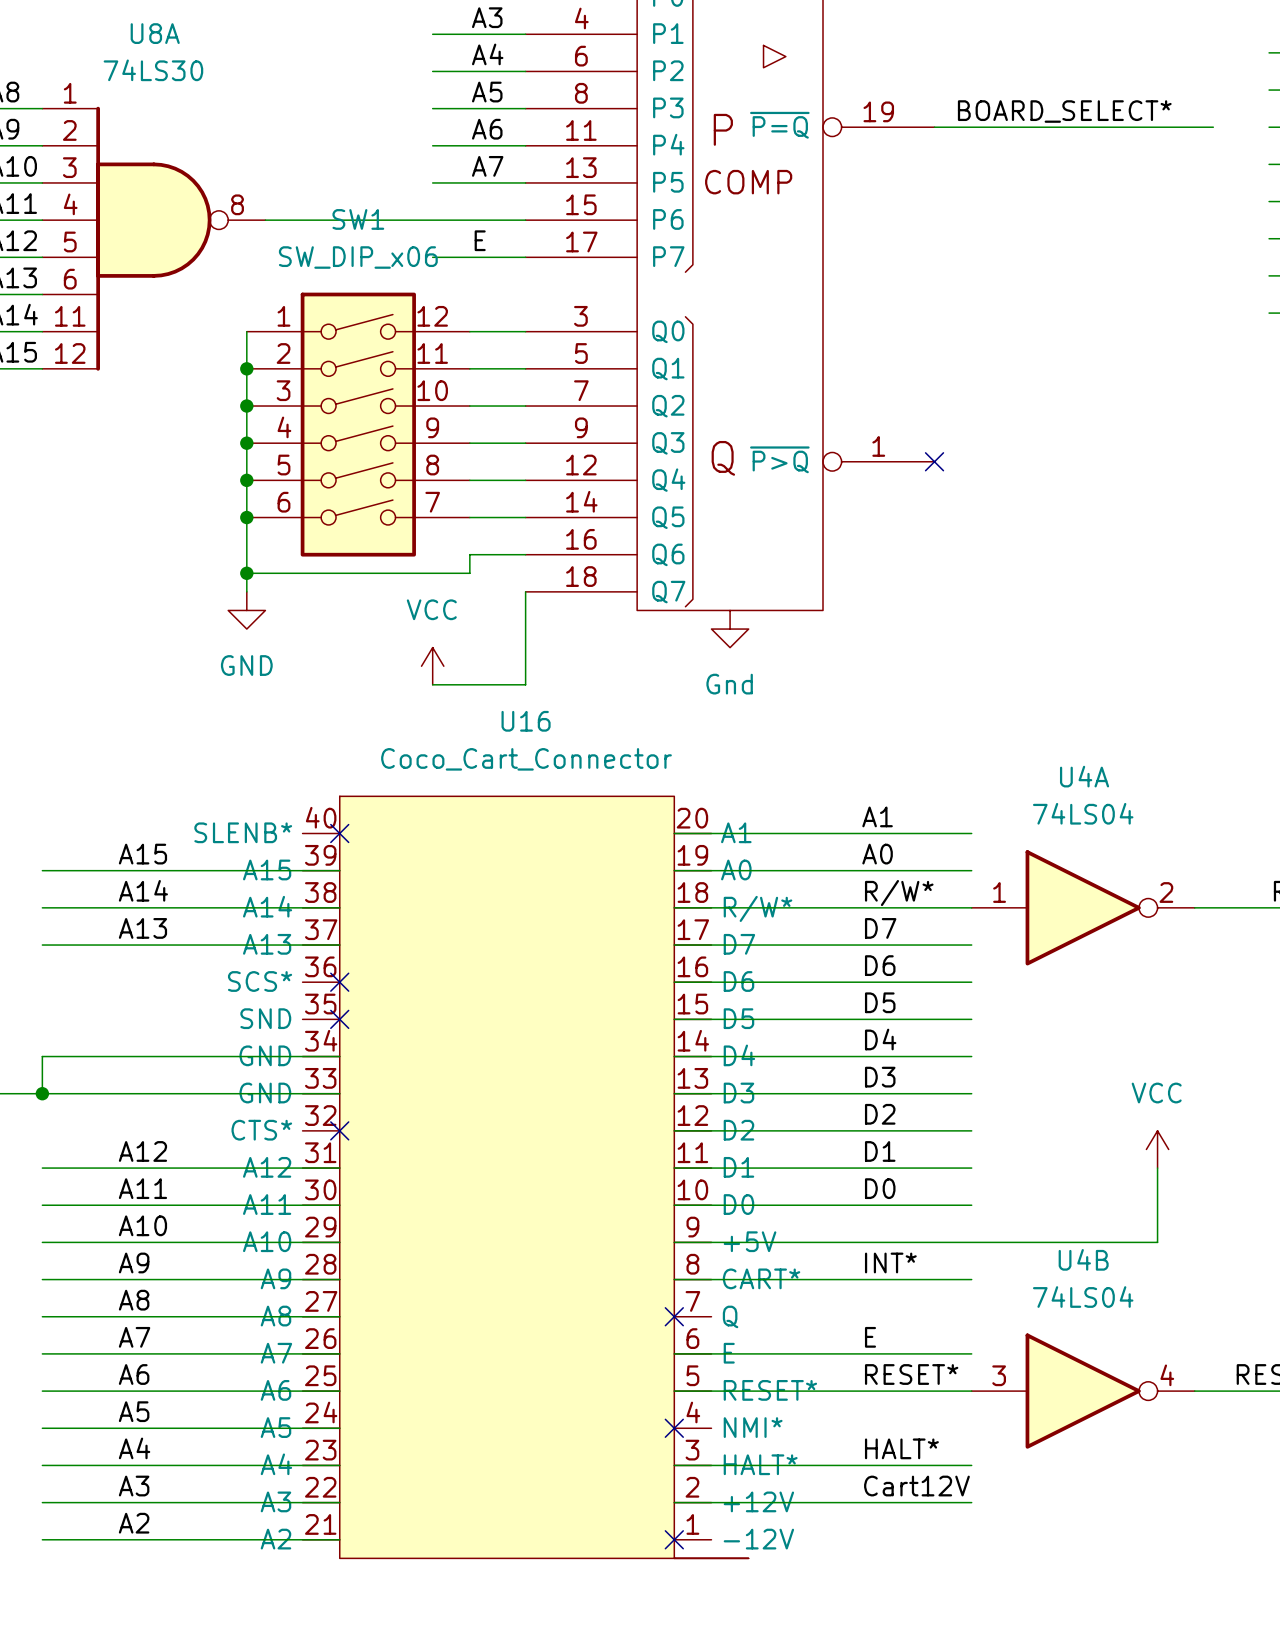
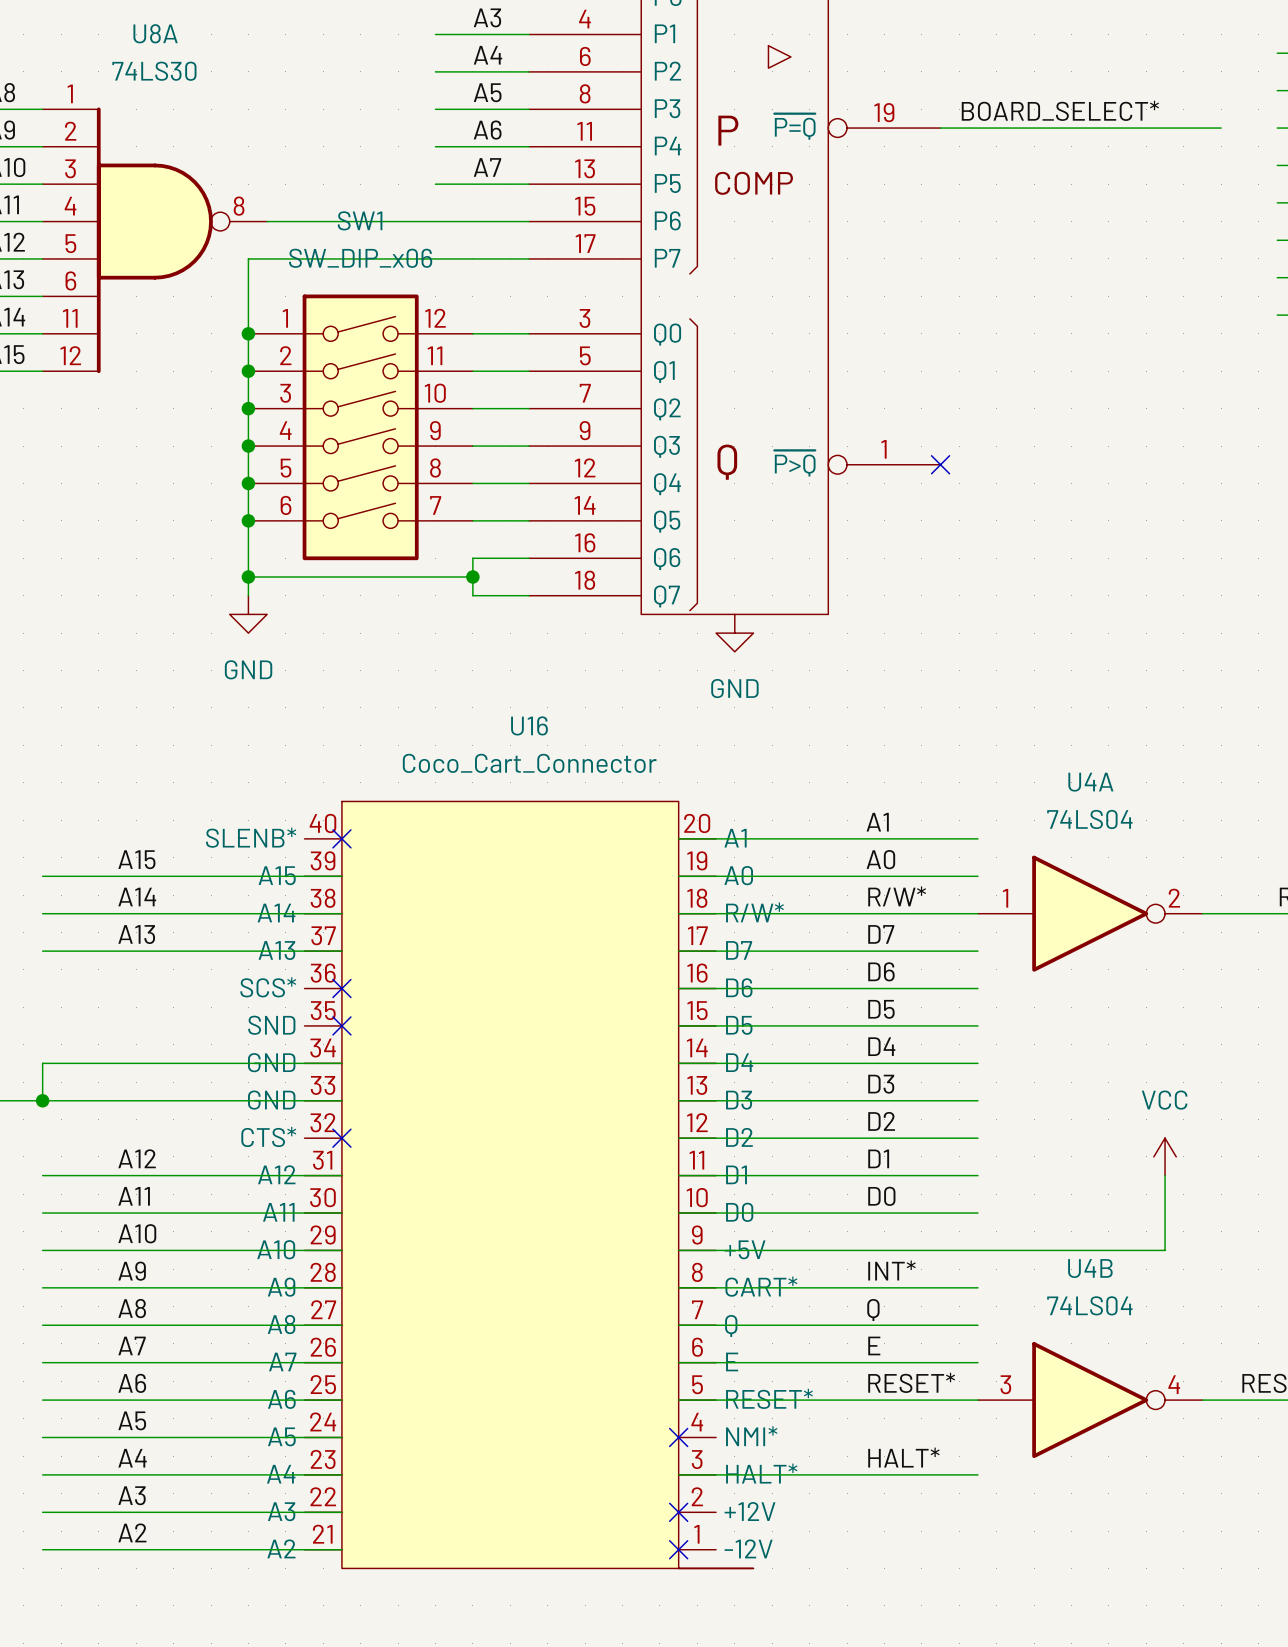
label: E (480, 240) -> none
wire: none -> (435, 258) (248, 258) (248, 333)
junction: none -> (248, 333)
junction: none -> (472, 576)
wire: (525, 591) (525, 684) (432, 684) -> (529, 595) (472, 595) (472, 576)
power symbol: Gnd (730, 629) -> GND (734, 633)
power symbol: VCC (432, 666) -> none
label: none -> Q (873, 1309)
no-connect mark: (674, 1316) -> none
label: Cart12V (916, 1486) -> none
wire: (674, 1502) (971, 1502) -> (678, 1325) (977, 1325)
no-connect mark: none -> (678, 1512)

